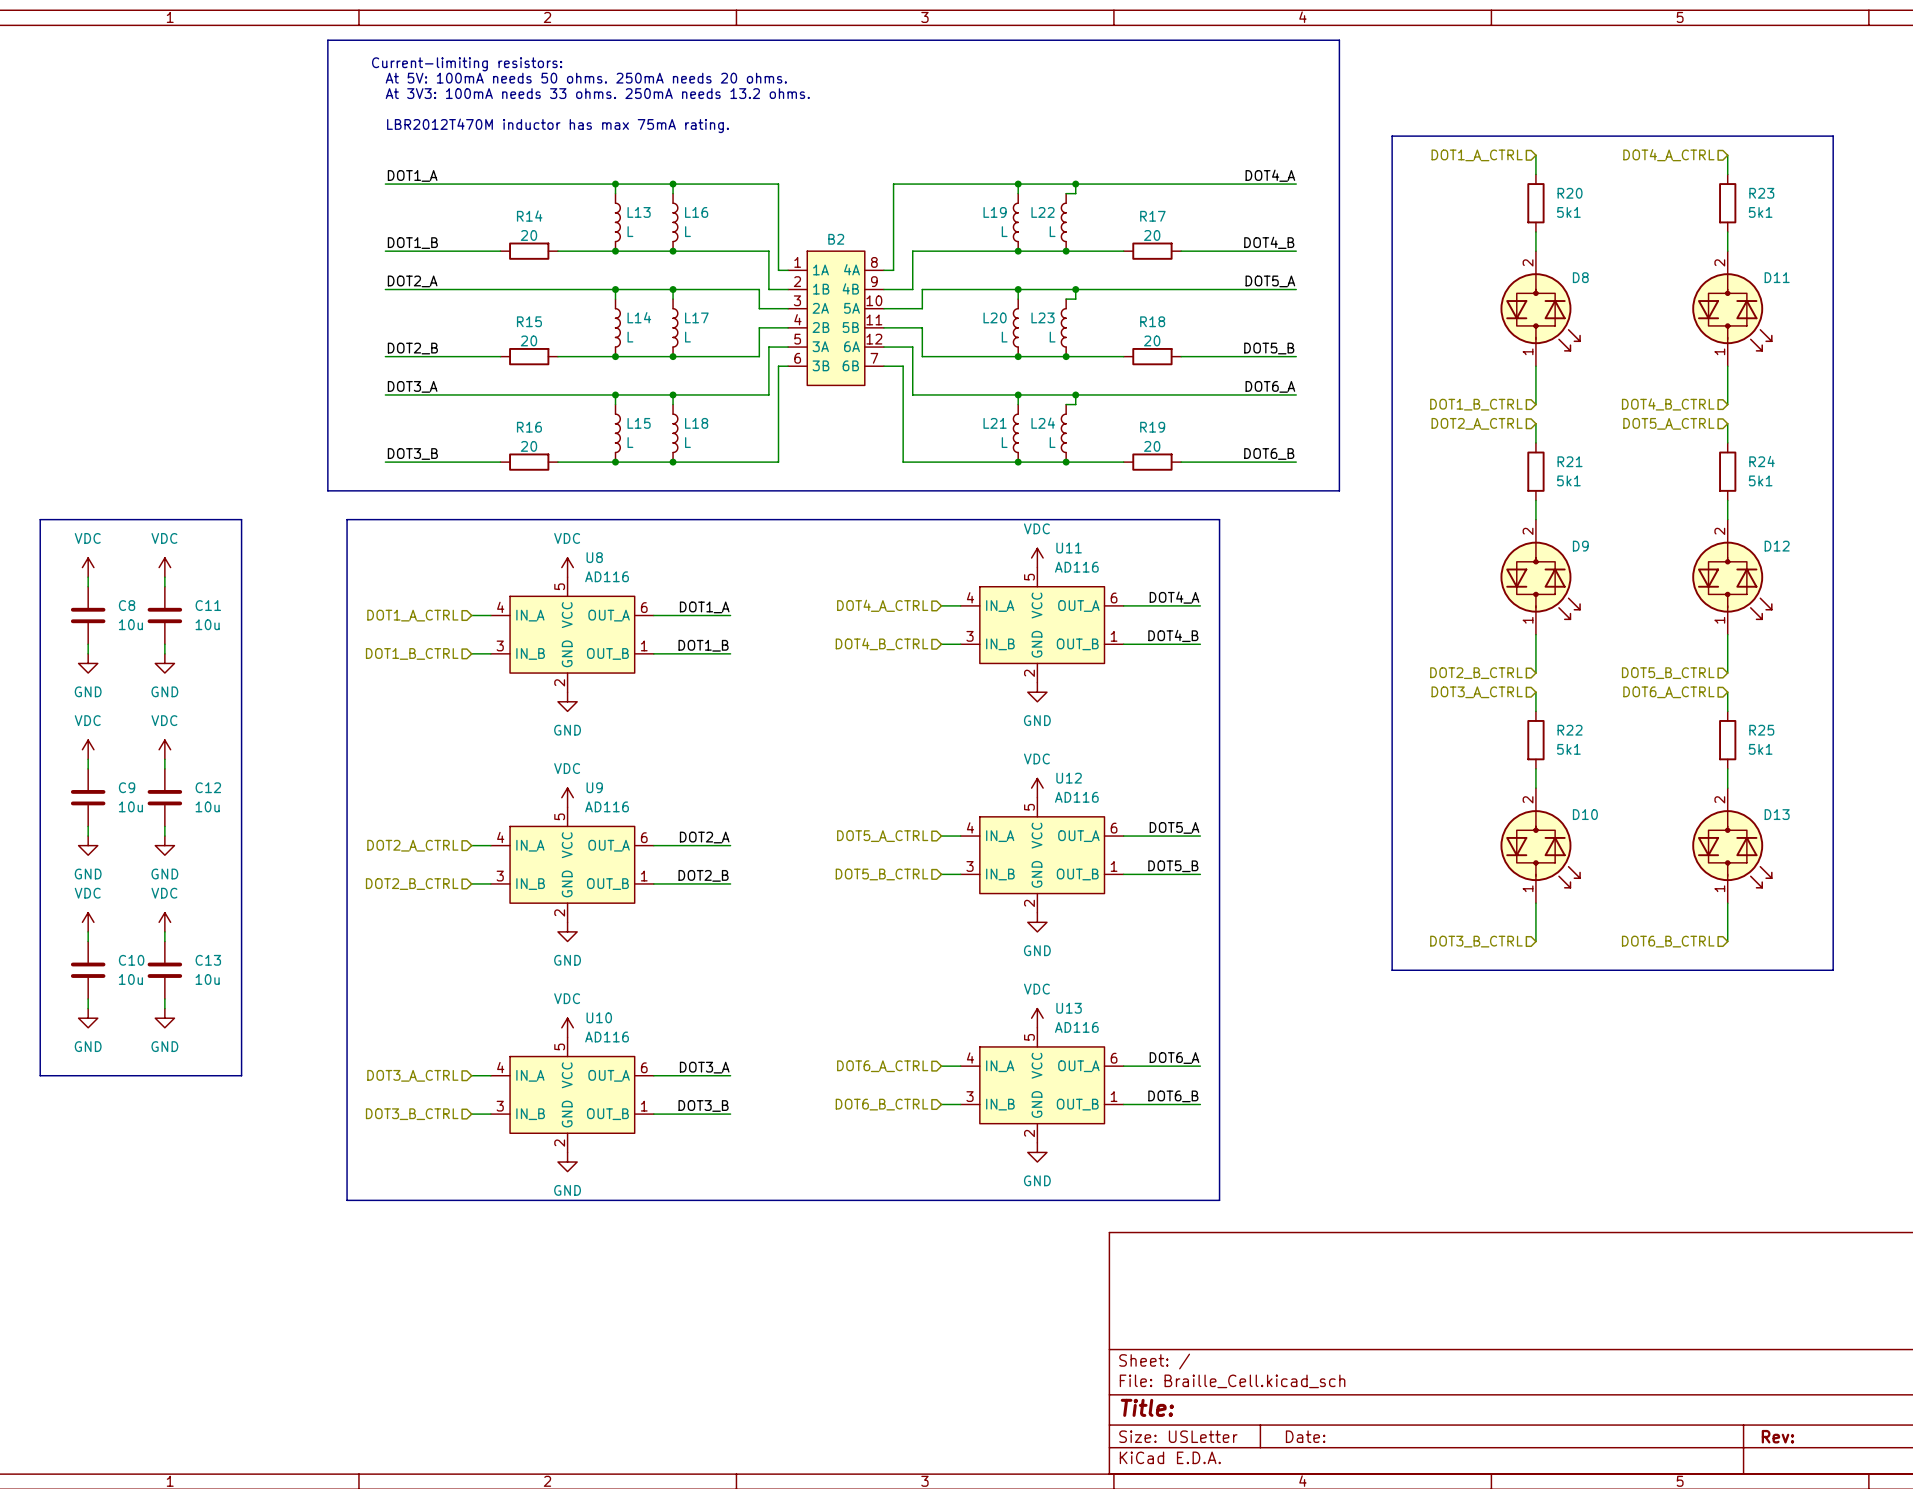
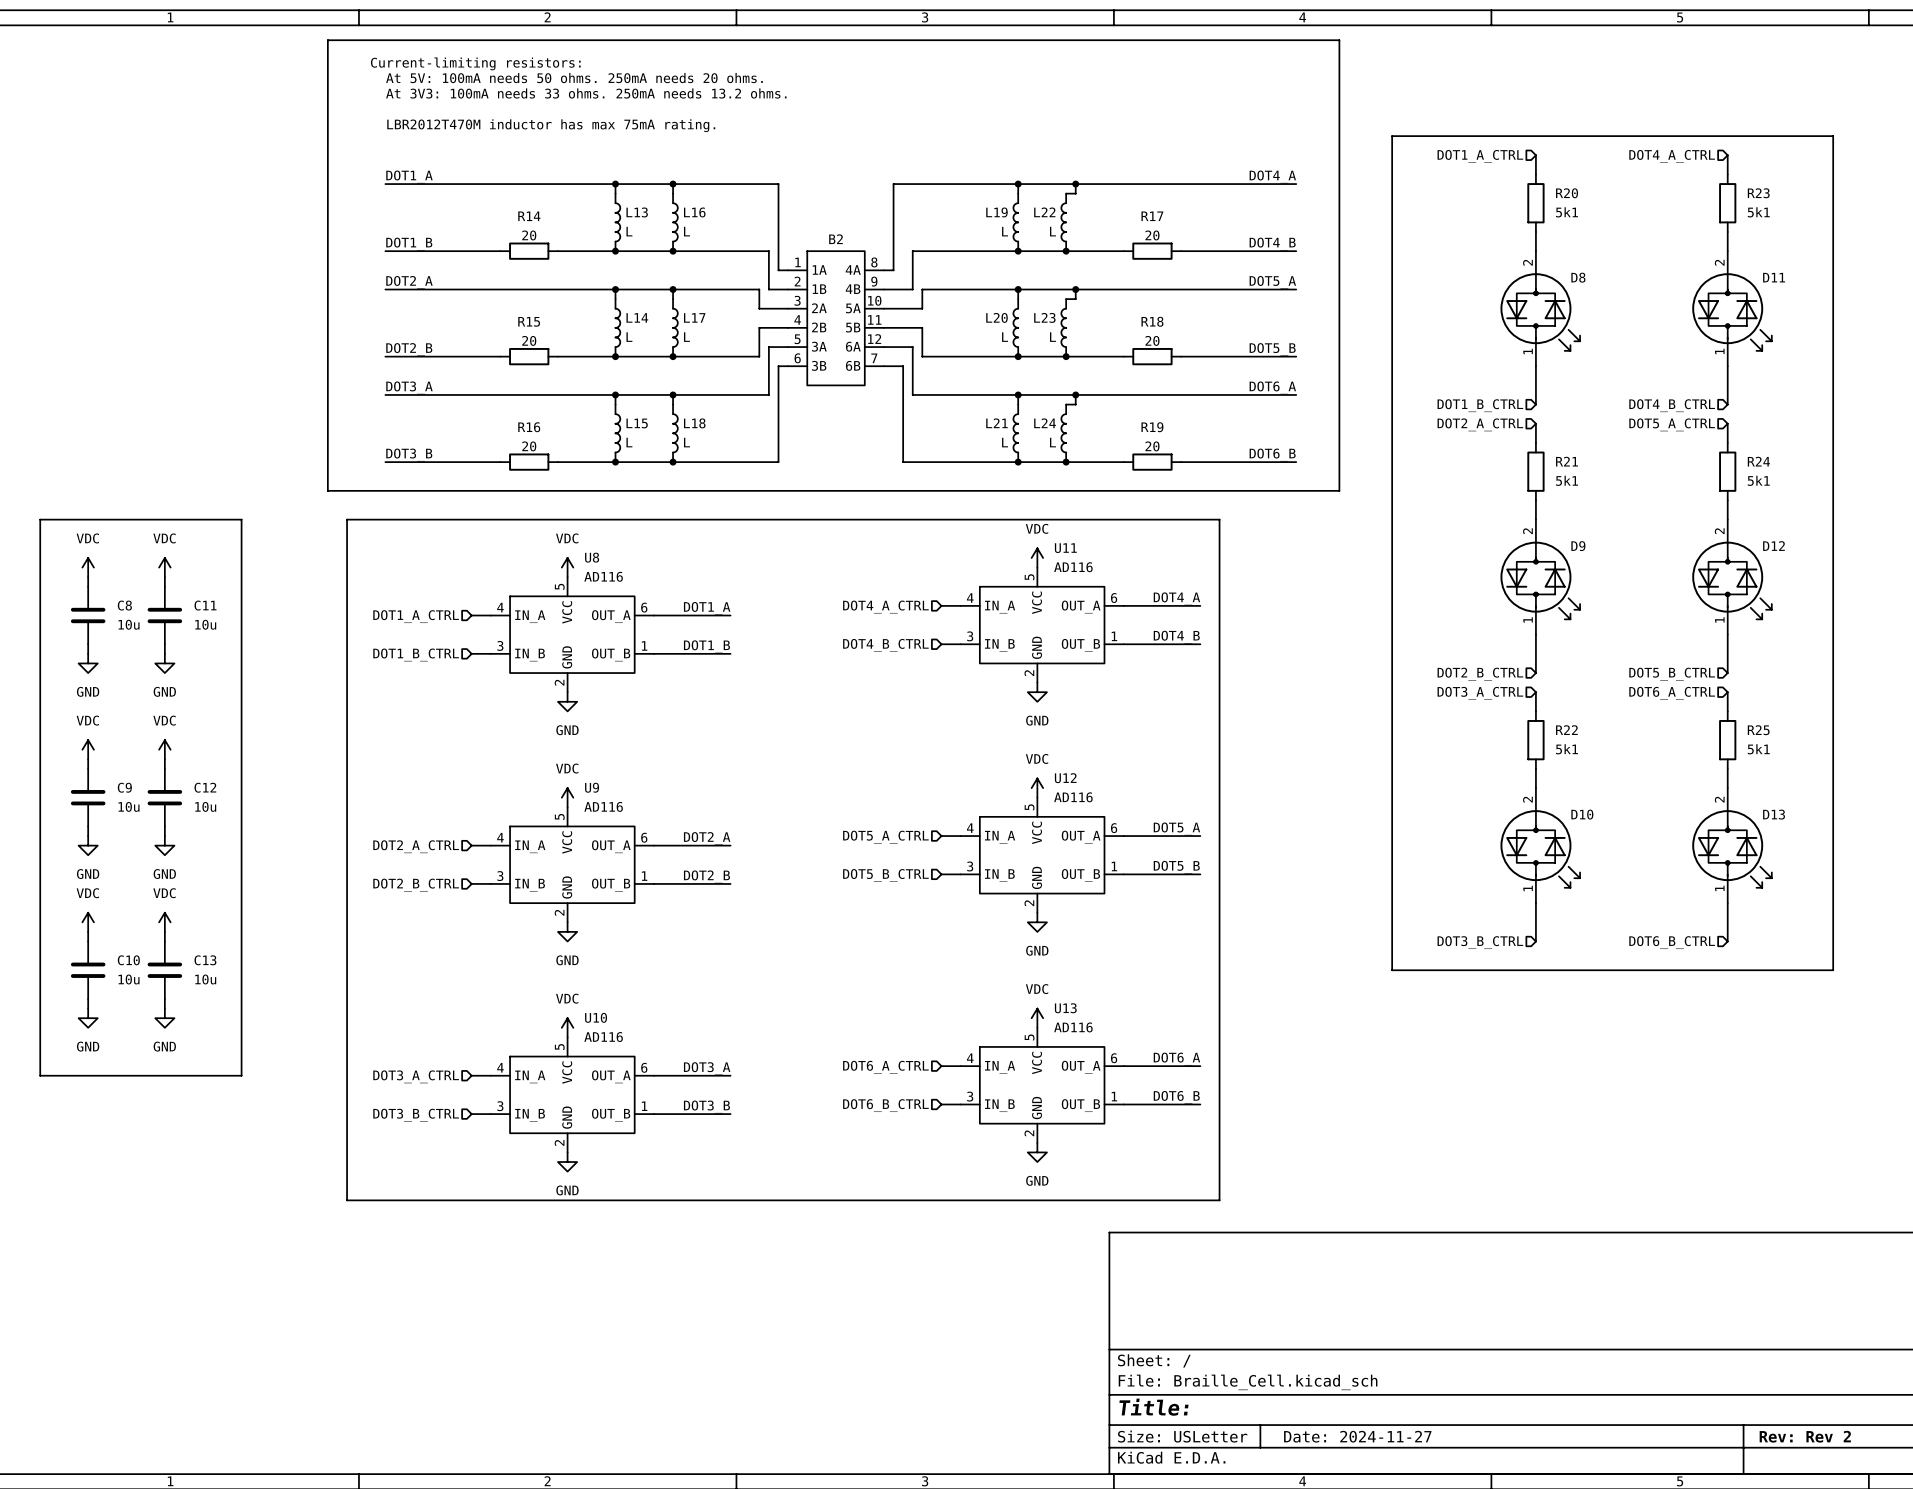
title block: Date: (1305, 1436) -> Date: 2024-11-27 (1357, 1436)
title block: Rev: (1777, 1436) -> Rev: Rev 2 (1805, 1436)

